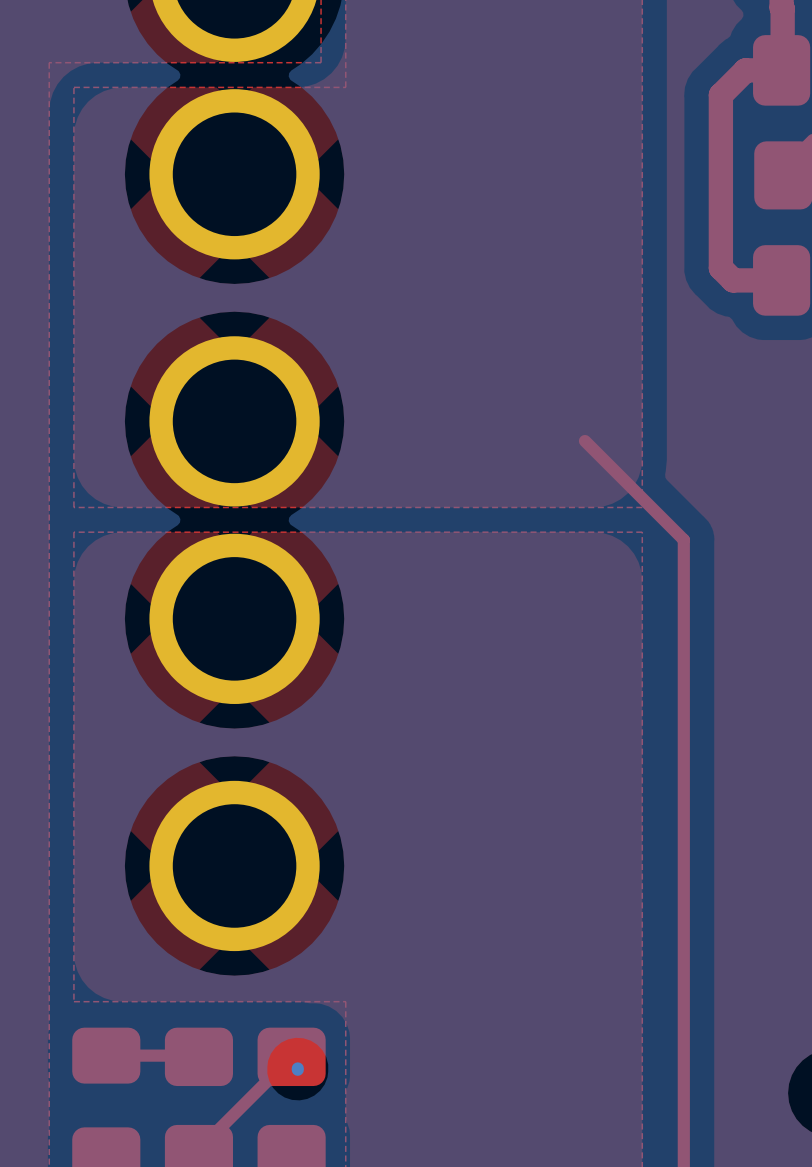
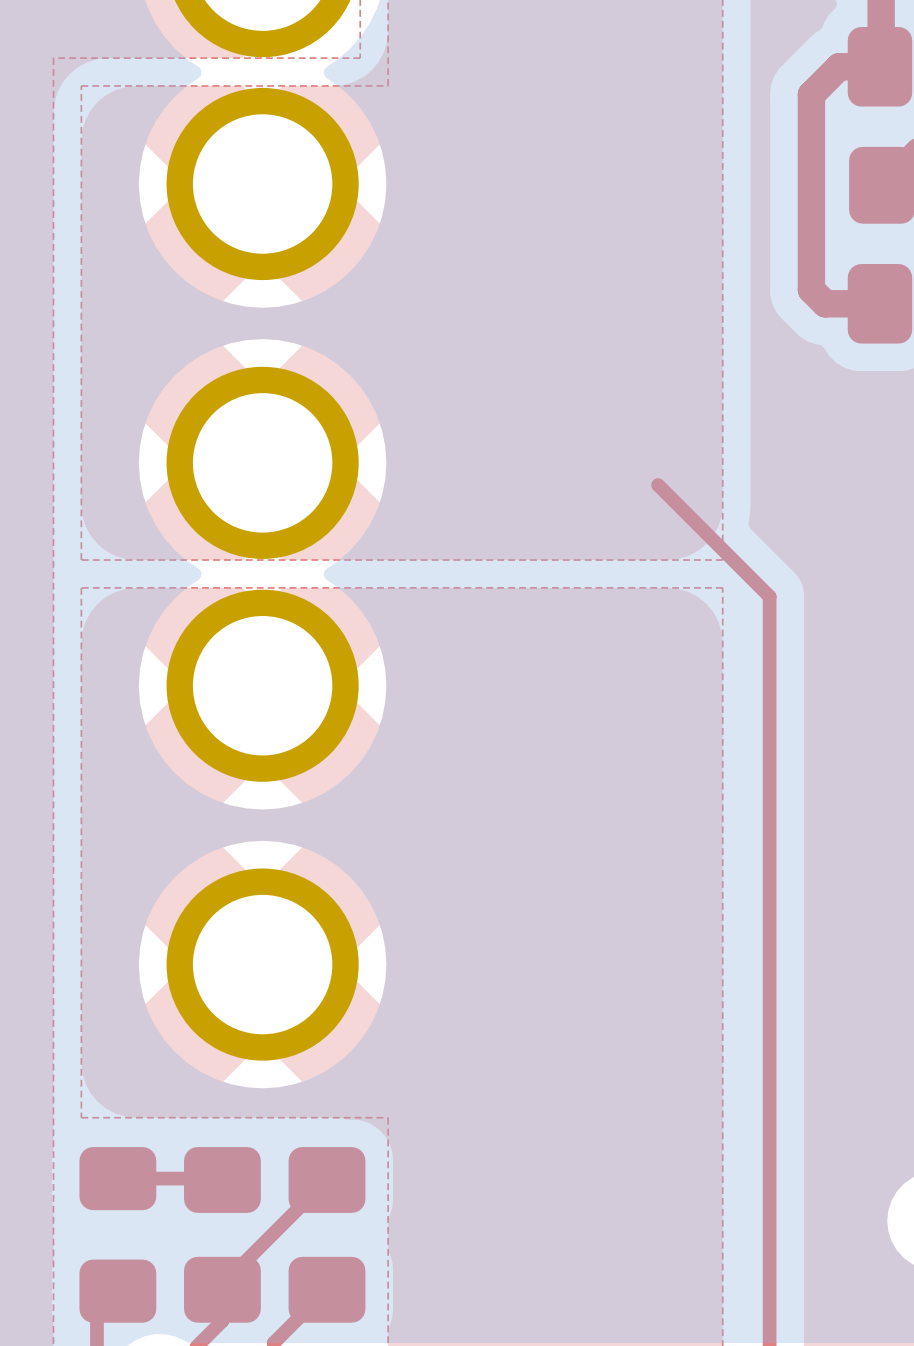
bottom track: (297, 1068) (297, 1069) -> none

